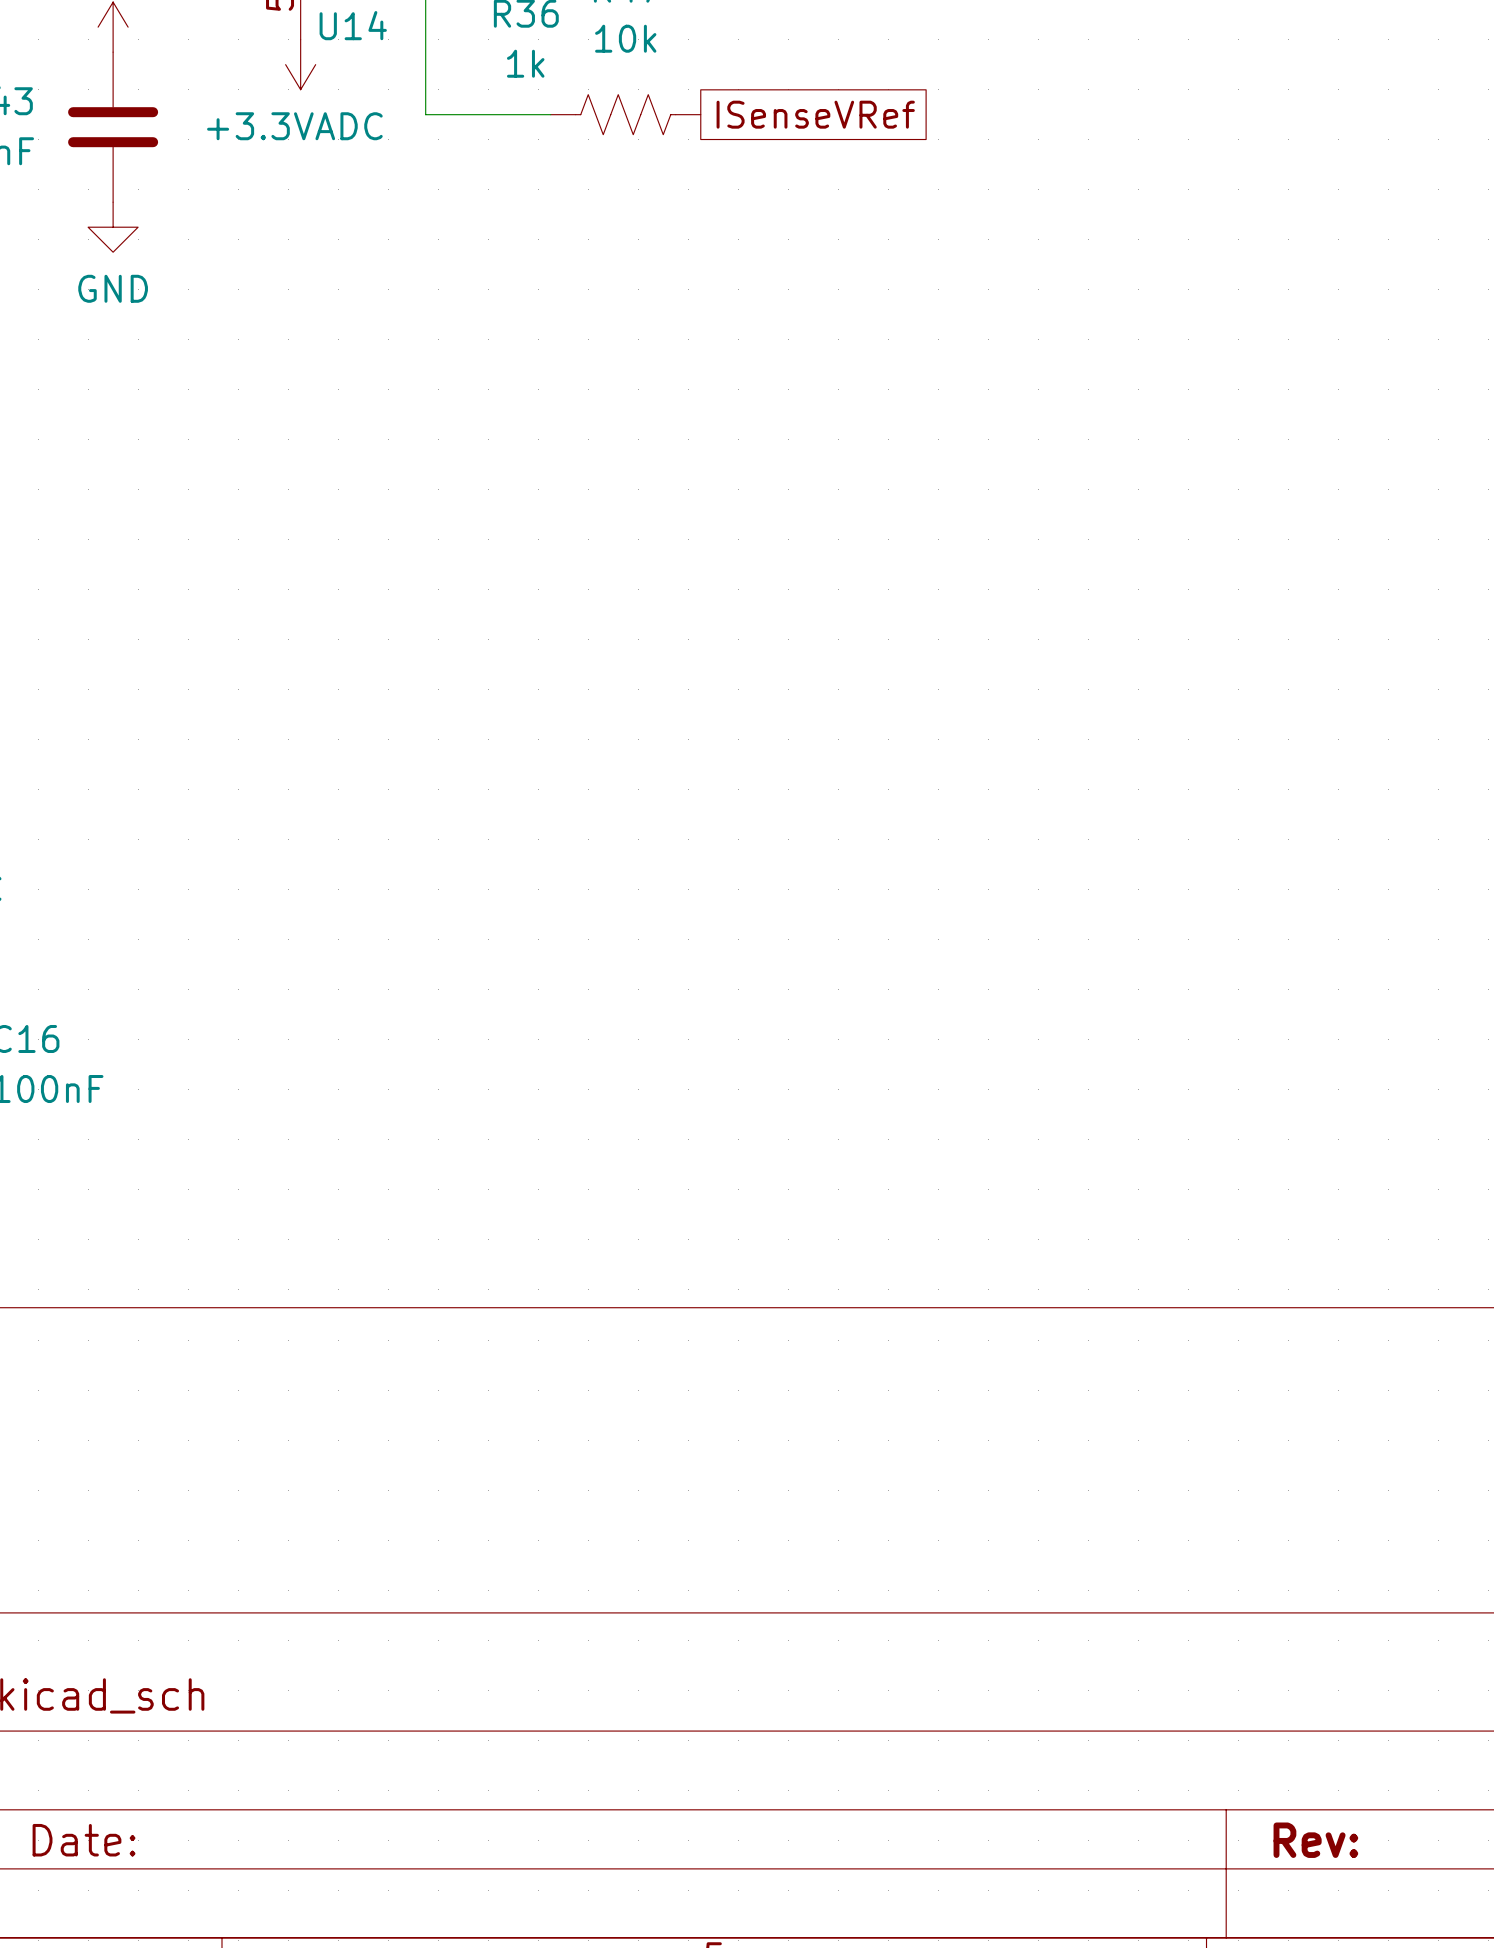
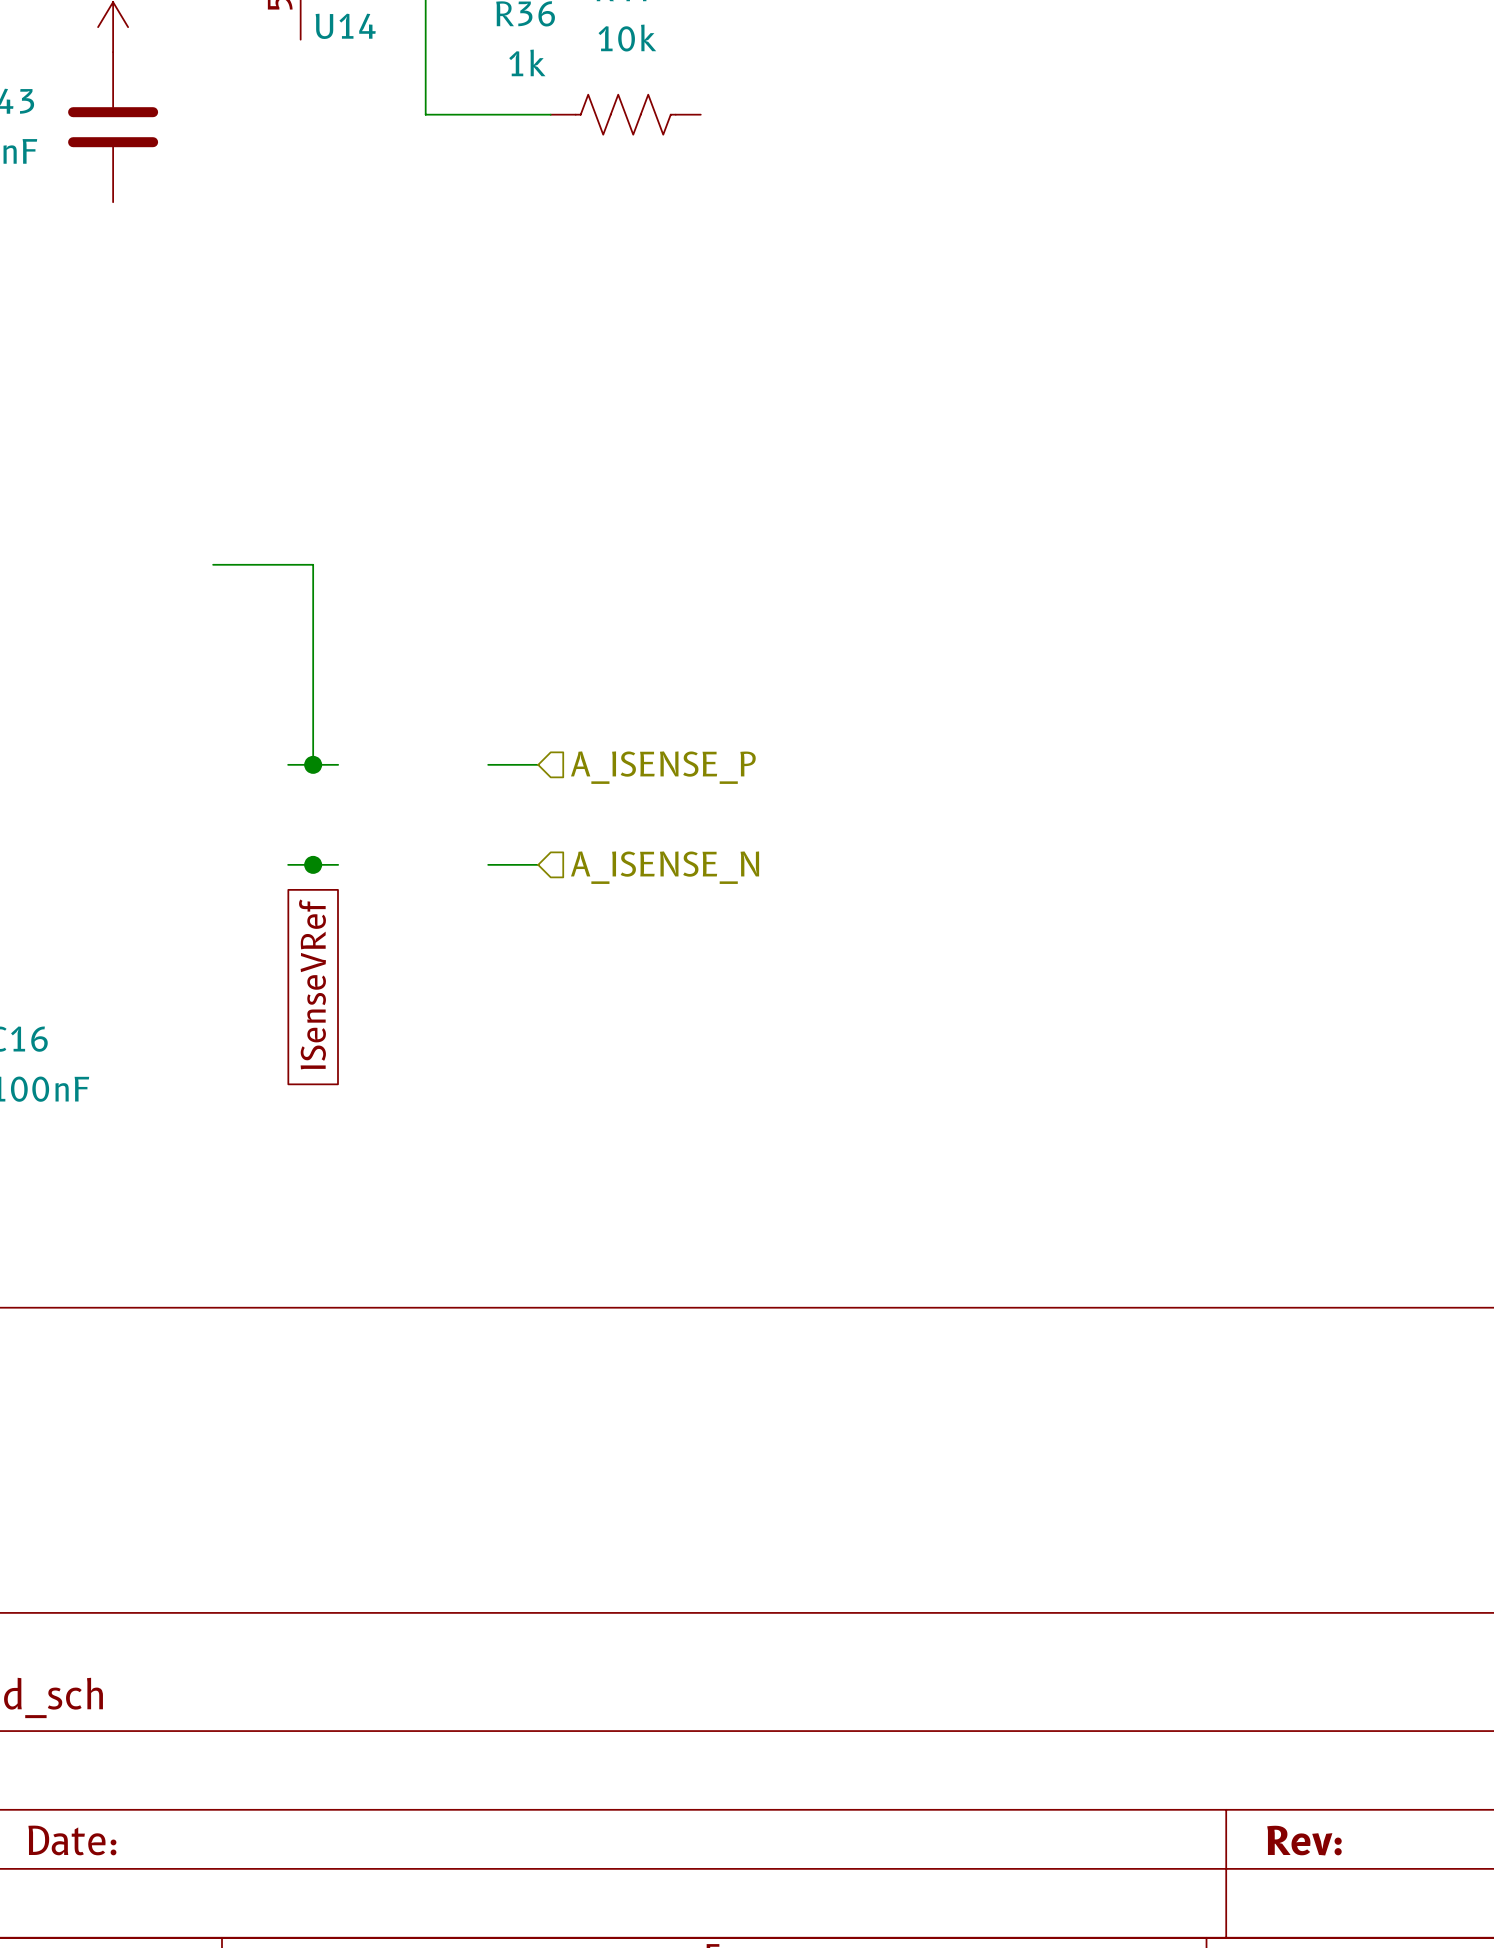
power symbol: +3.3VADC (300, 64) -> none
global label: ISenseVRef (815, 114) -> none
power symbol: GND (113, 227) -> none
wire: none -> (213, 564) (313, 564) (313, 764)
wire: none -> (288, 764) (338, 764)
junction: none -> (313, 764)
wire: none -> (488, 764) (538, 764)
hierarchical label: none -> A_ISENSE_P (663, 767)
wire: none -> (288, 864) (338, 864)
junction: none -> (313, 864)
wire: none -> (488, 864) (538, 864)
hierarchical label: none -> A_ISENSE_N (665, 867)
global label: none -> ISenseVRef (312, 984)

